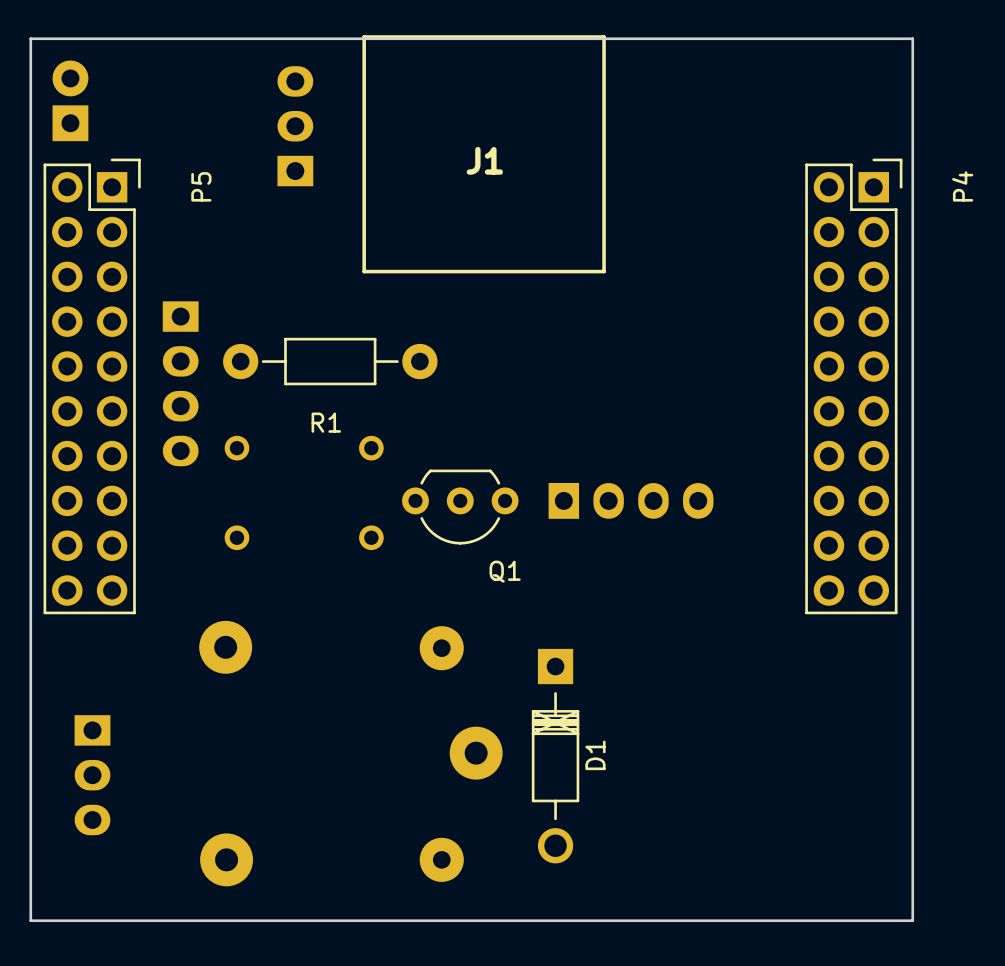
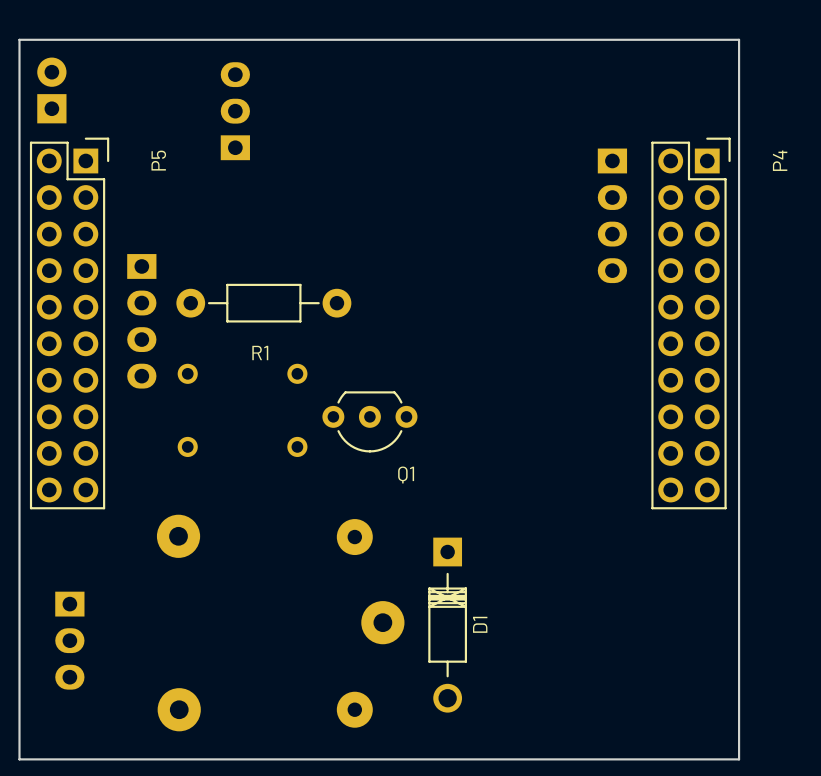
J1: (484, 154) -> none
part rotation: 0° (631, 500) -> 90° clockwise (612, 215)
part position: (631, 500) -> (612, 215)

